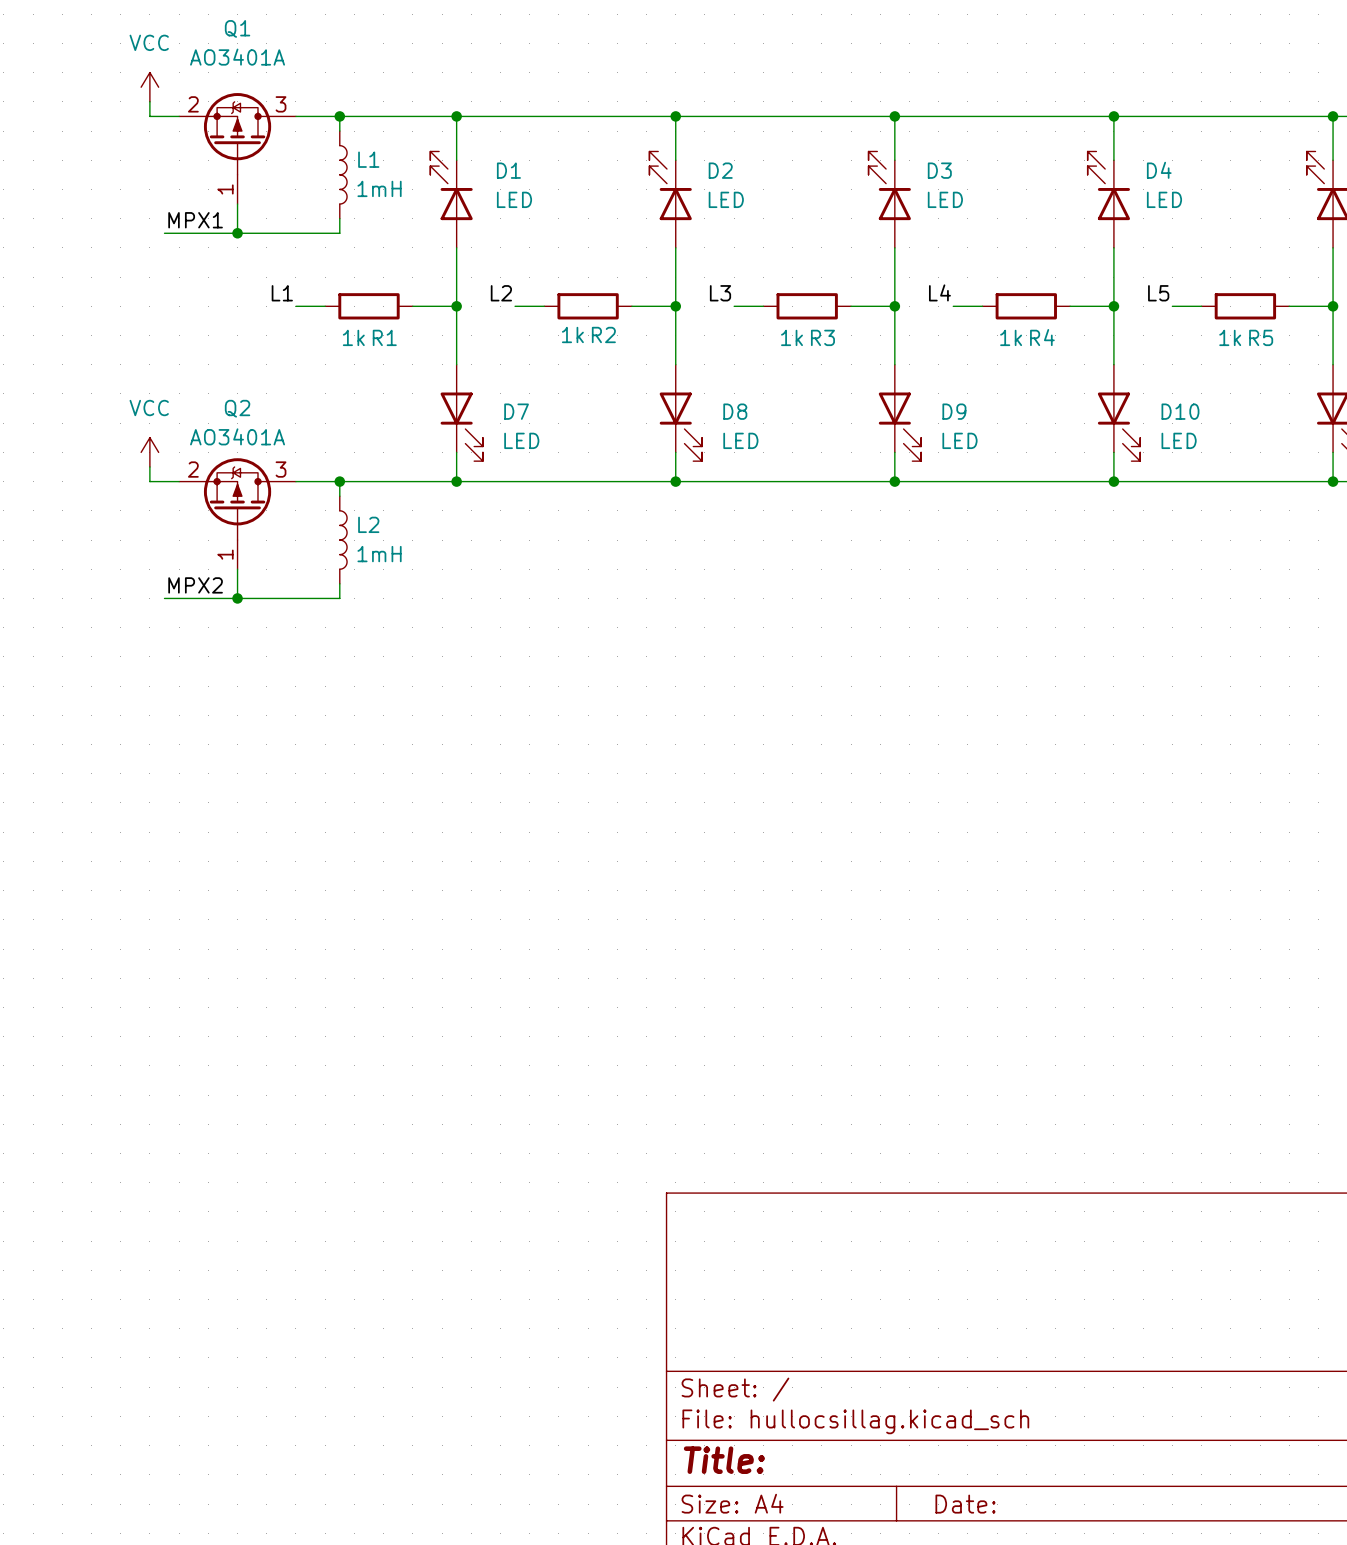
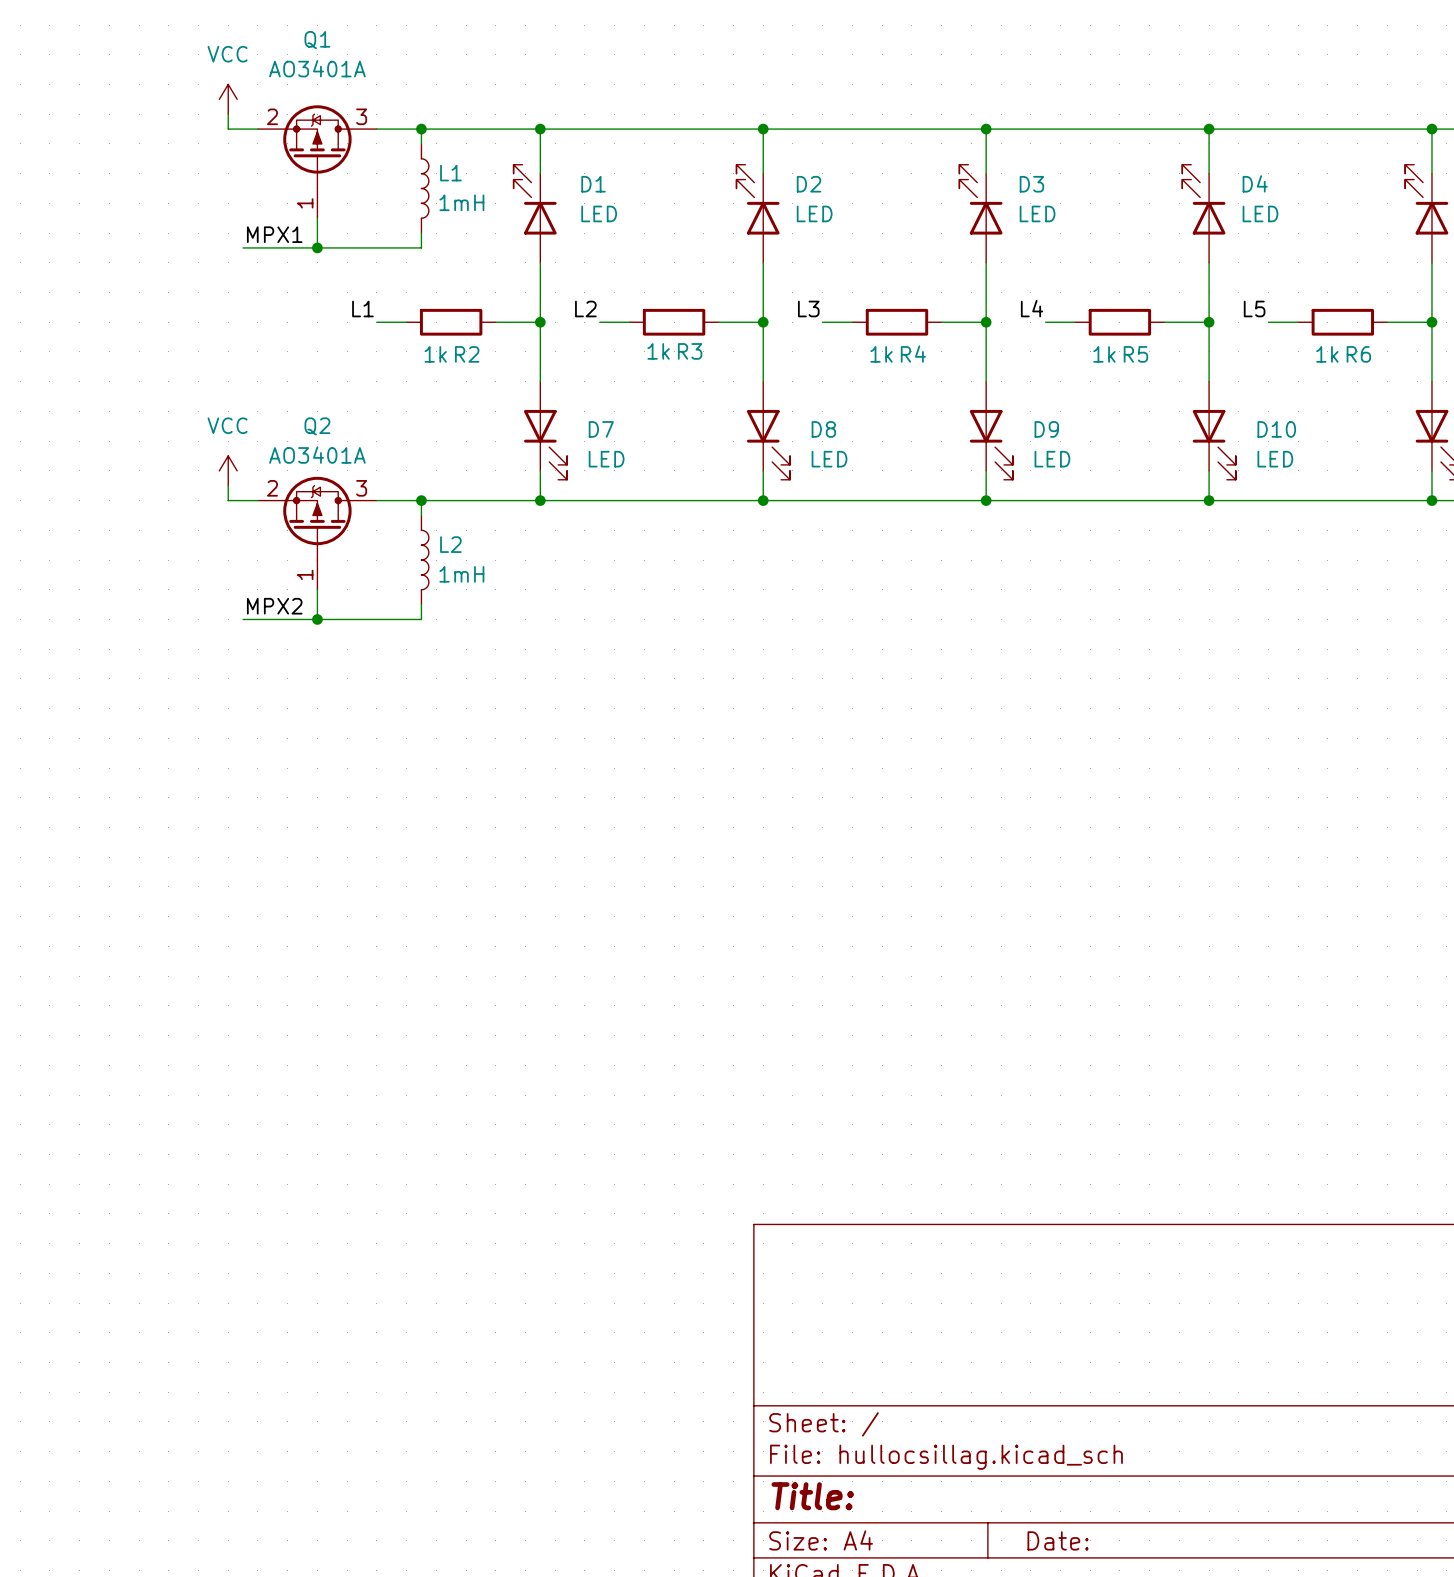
R2 name: R2 (603, 334) -> R3 (690, 351)
R1 name: R1 (384, 337) -> R2 (467, 354)
R3 name: R3 (822, 337) -> R4 (913, 354)
R4 name: R4 (1042, 337) -> R5 (1135, 354)
R5 name: R5 (1261, 337) -> R6 (1358, 354)

